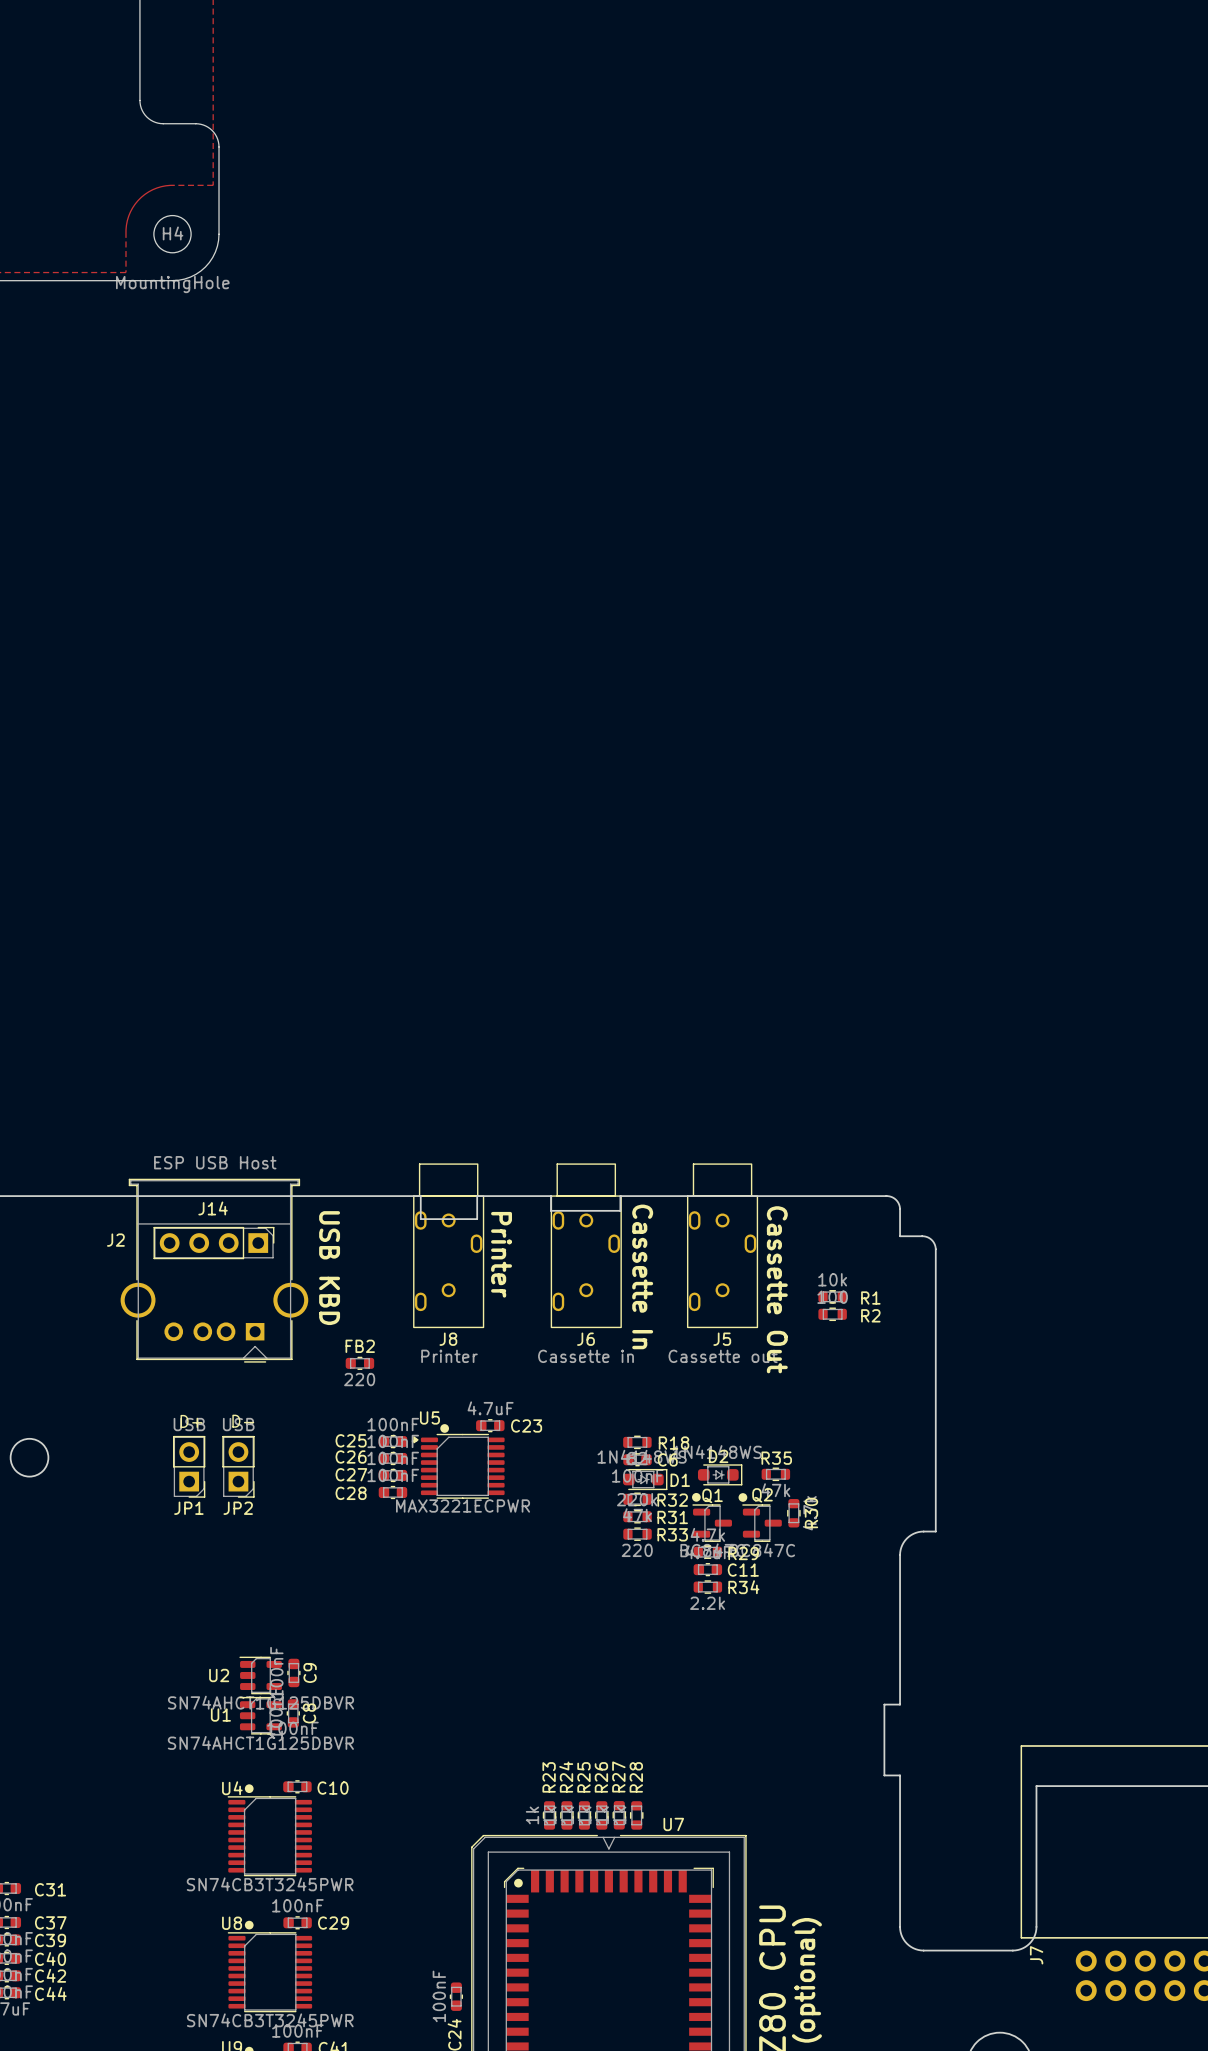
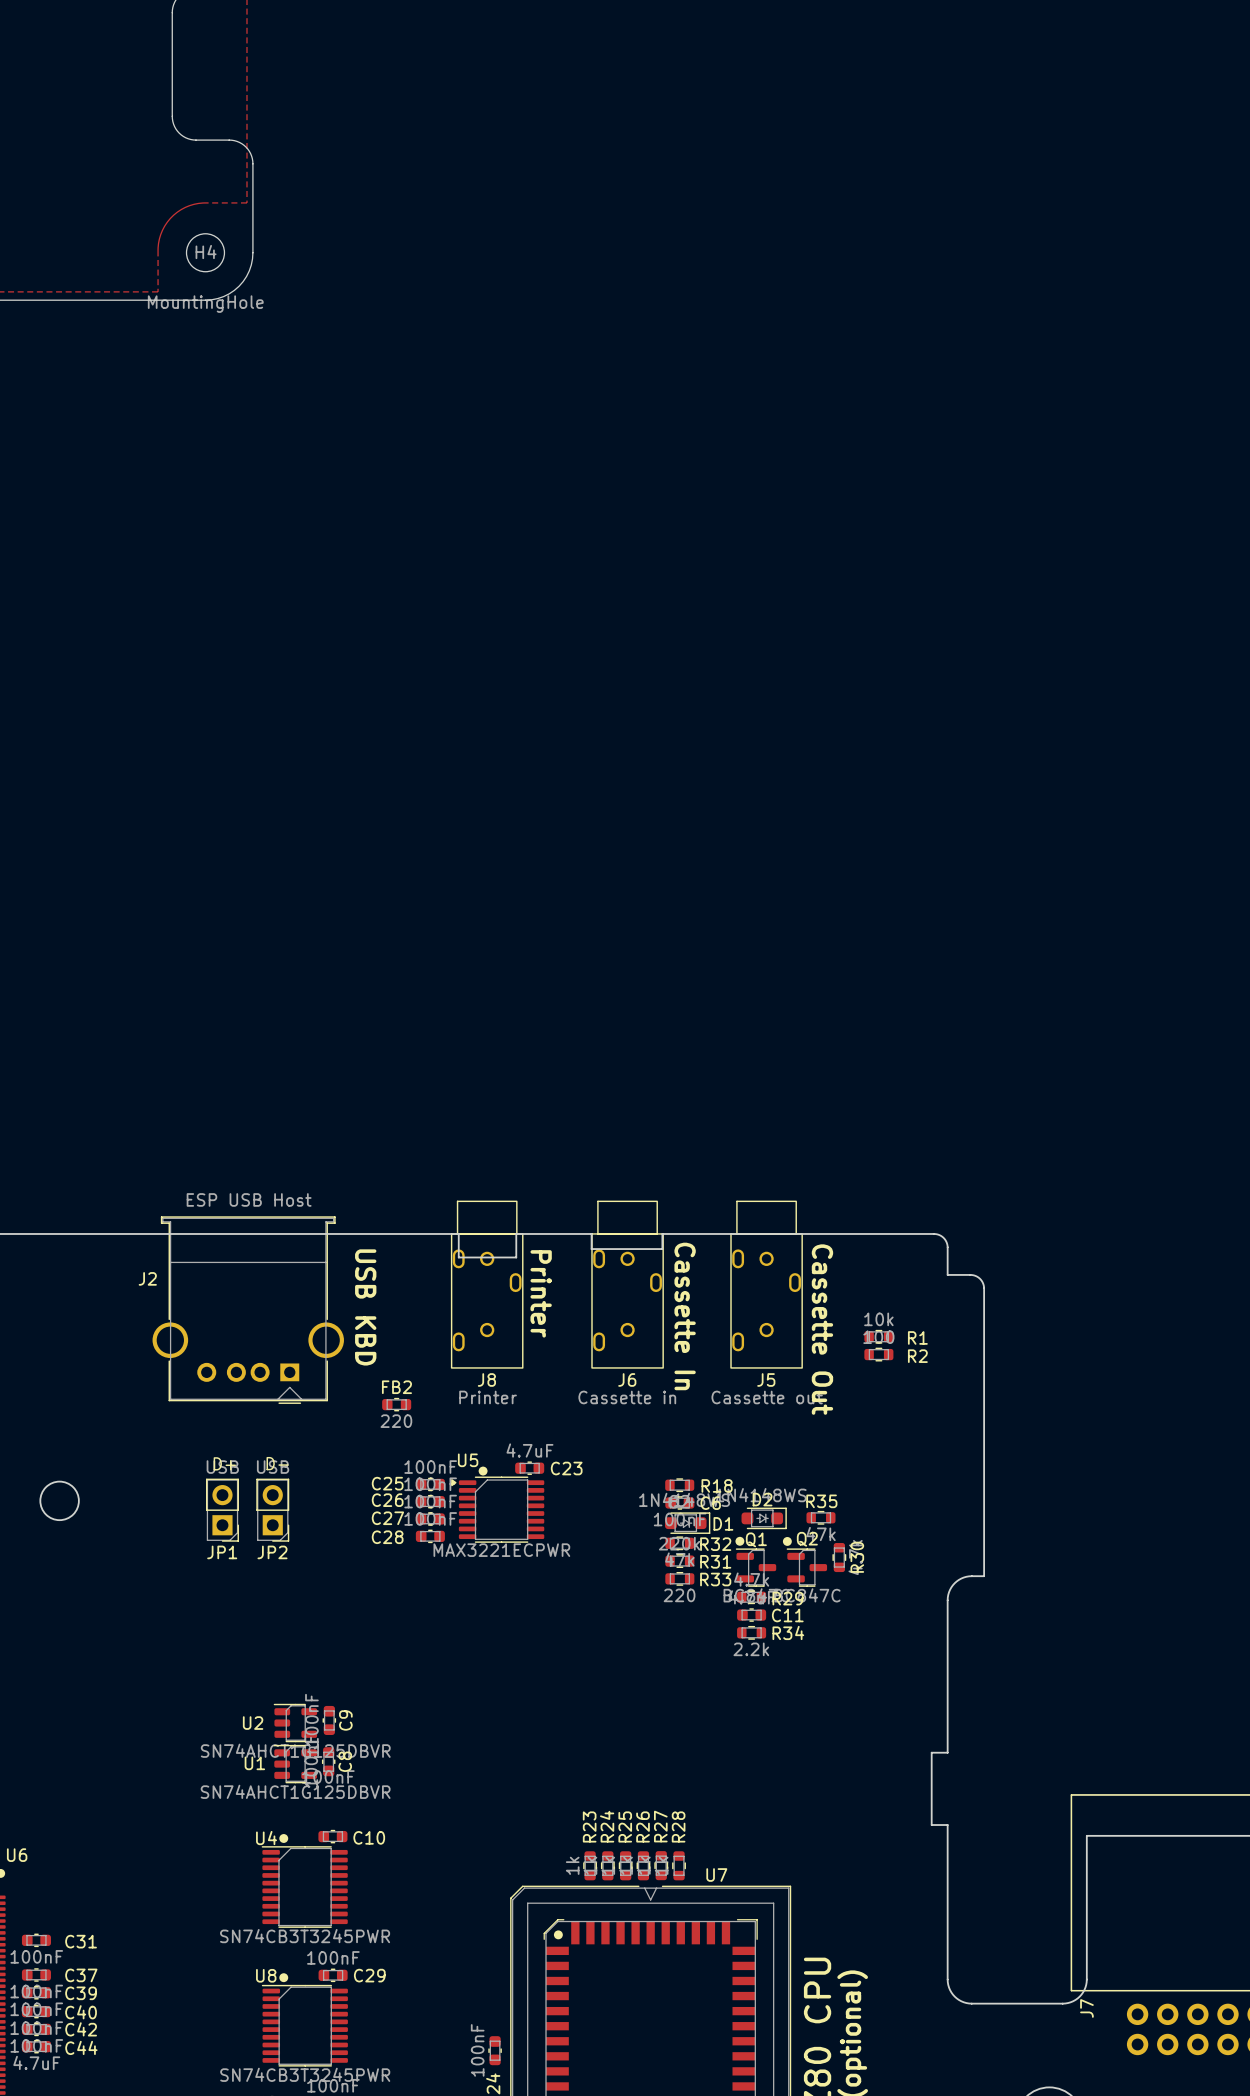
J14: (213, 1243) -> none

